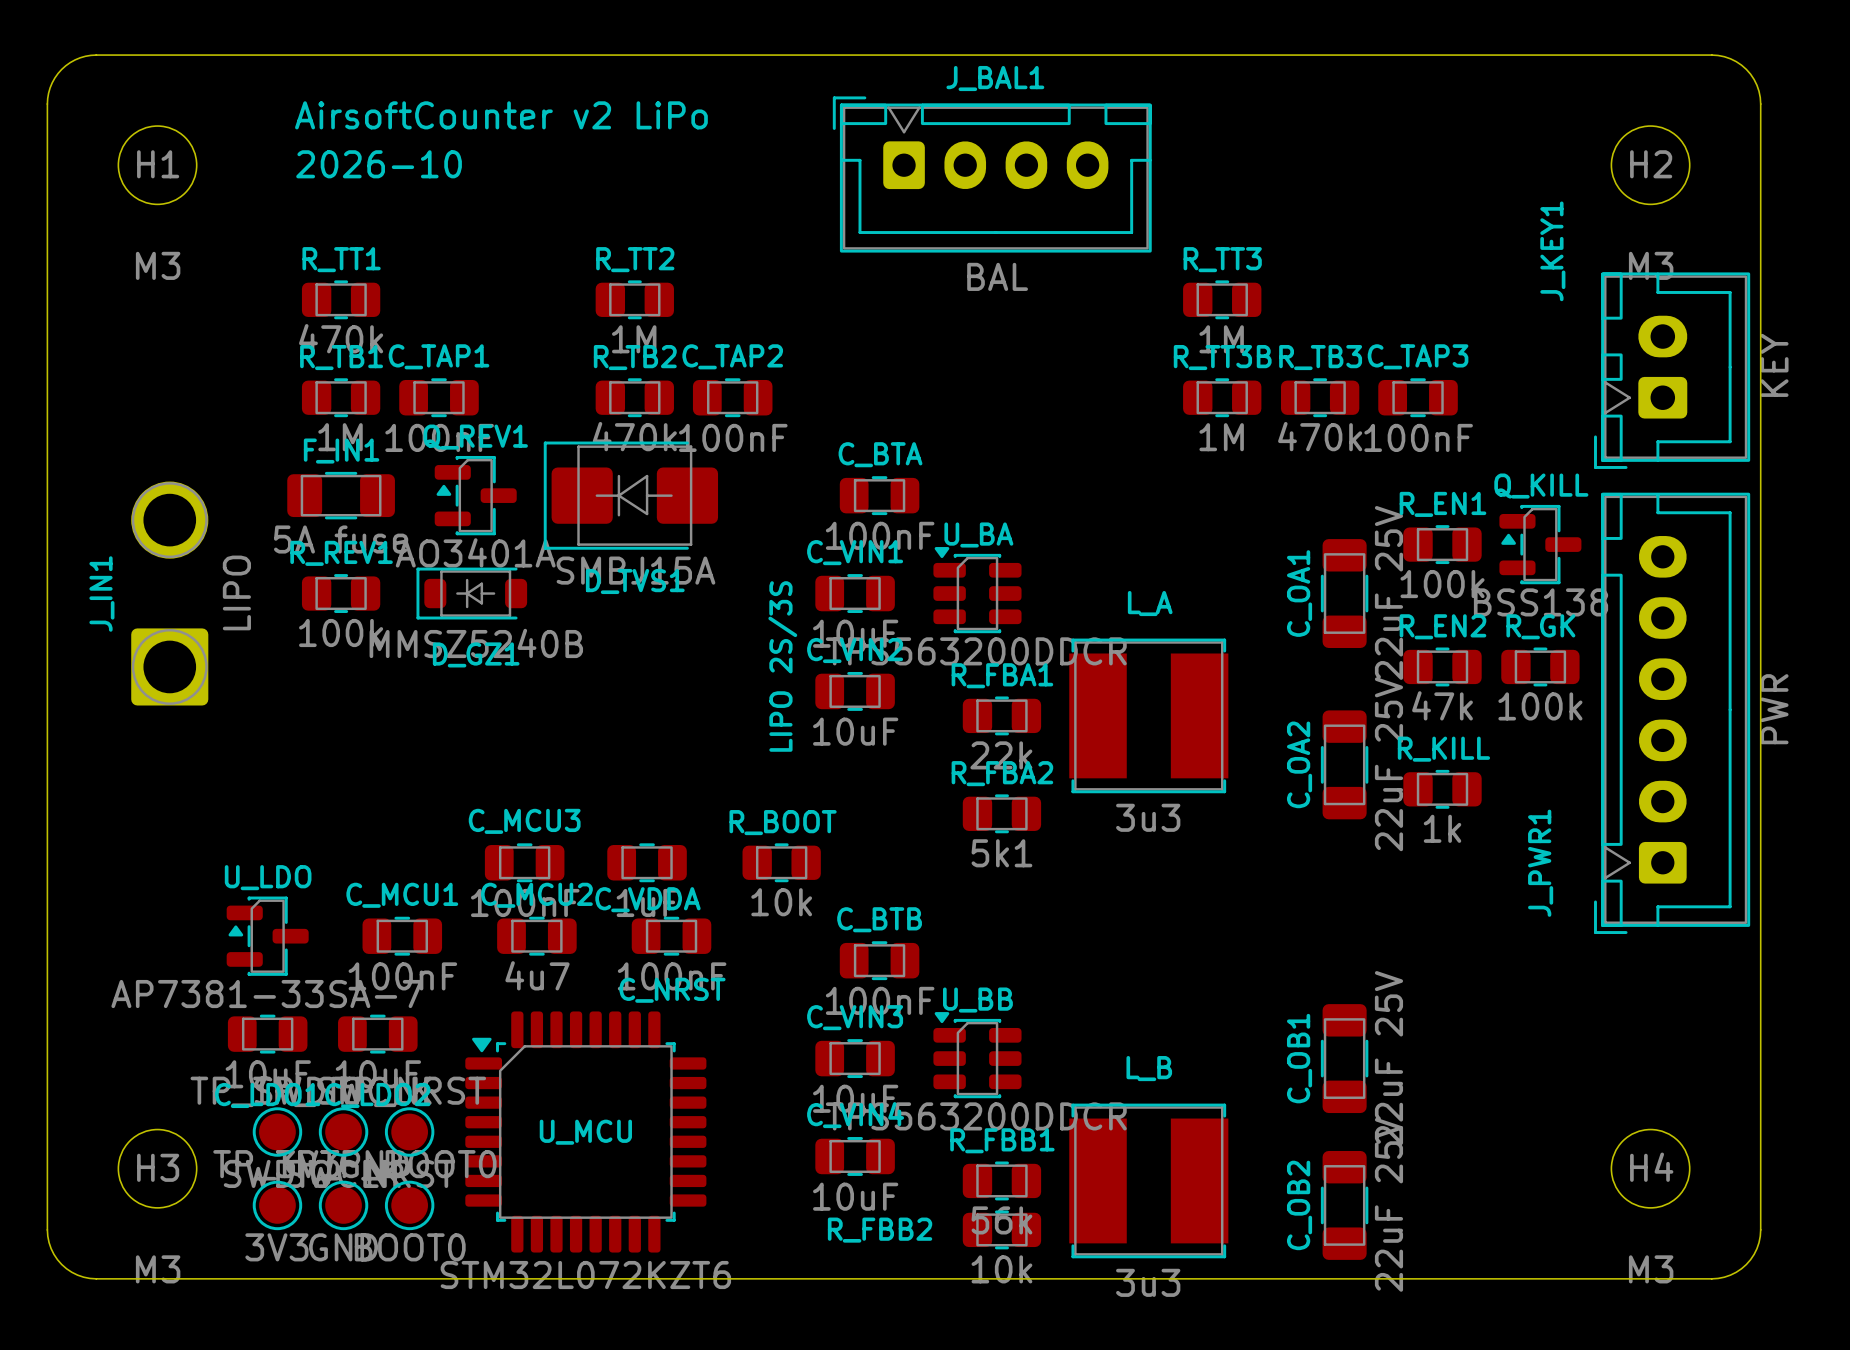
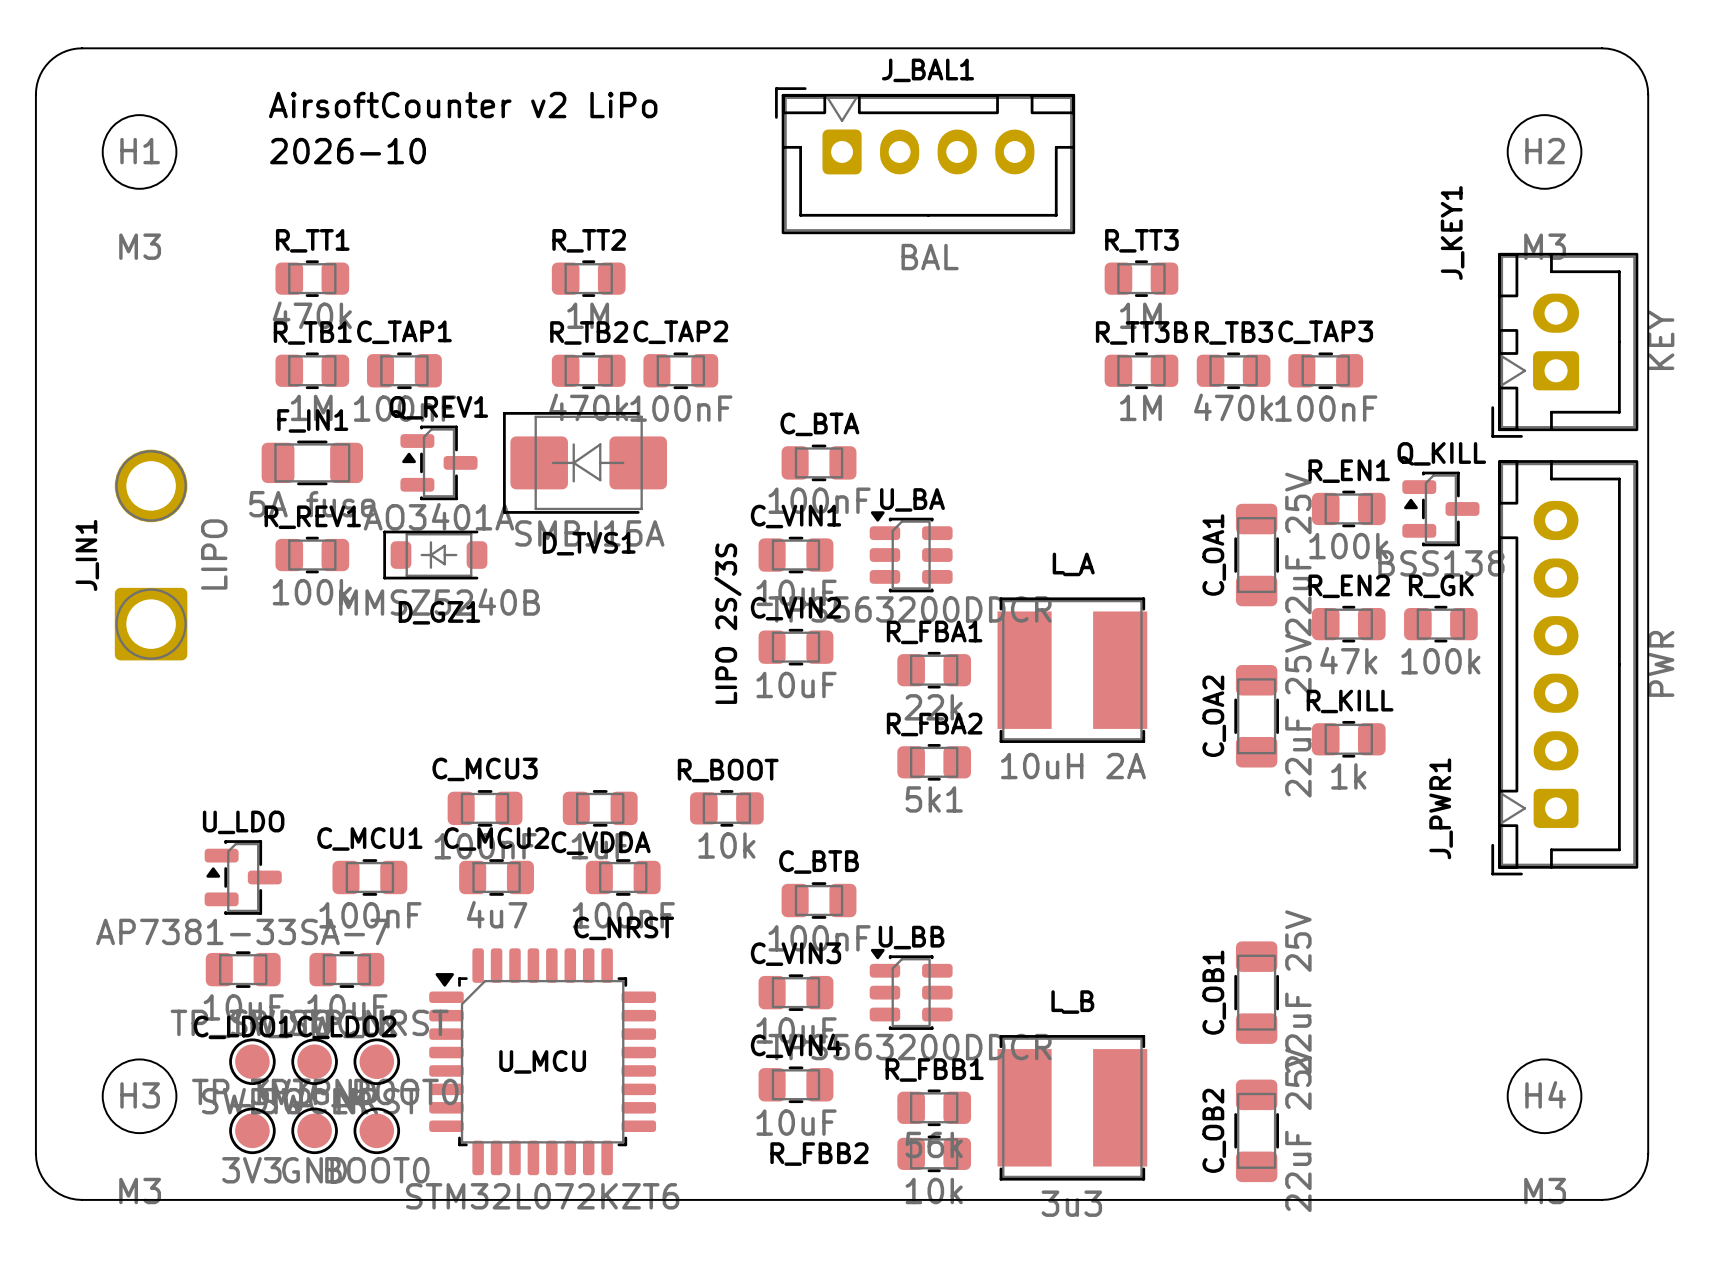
L_A value: 3u3 (1148, 817) -> 10uH 2A (1073, 766)

